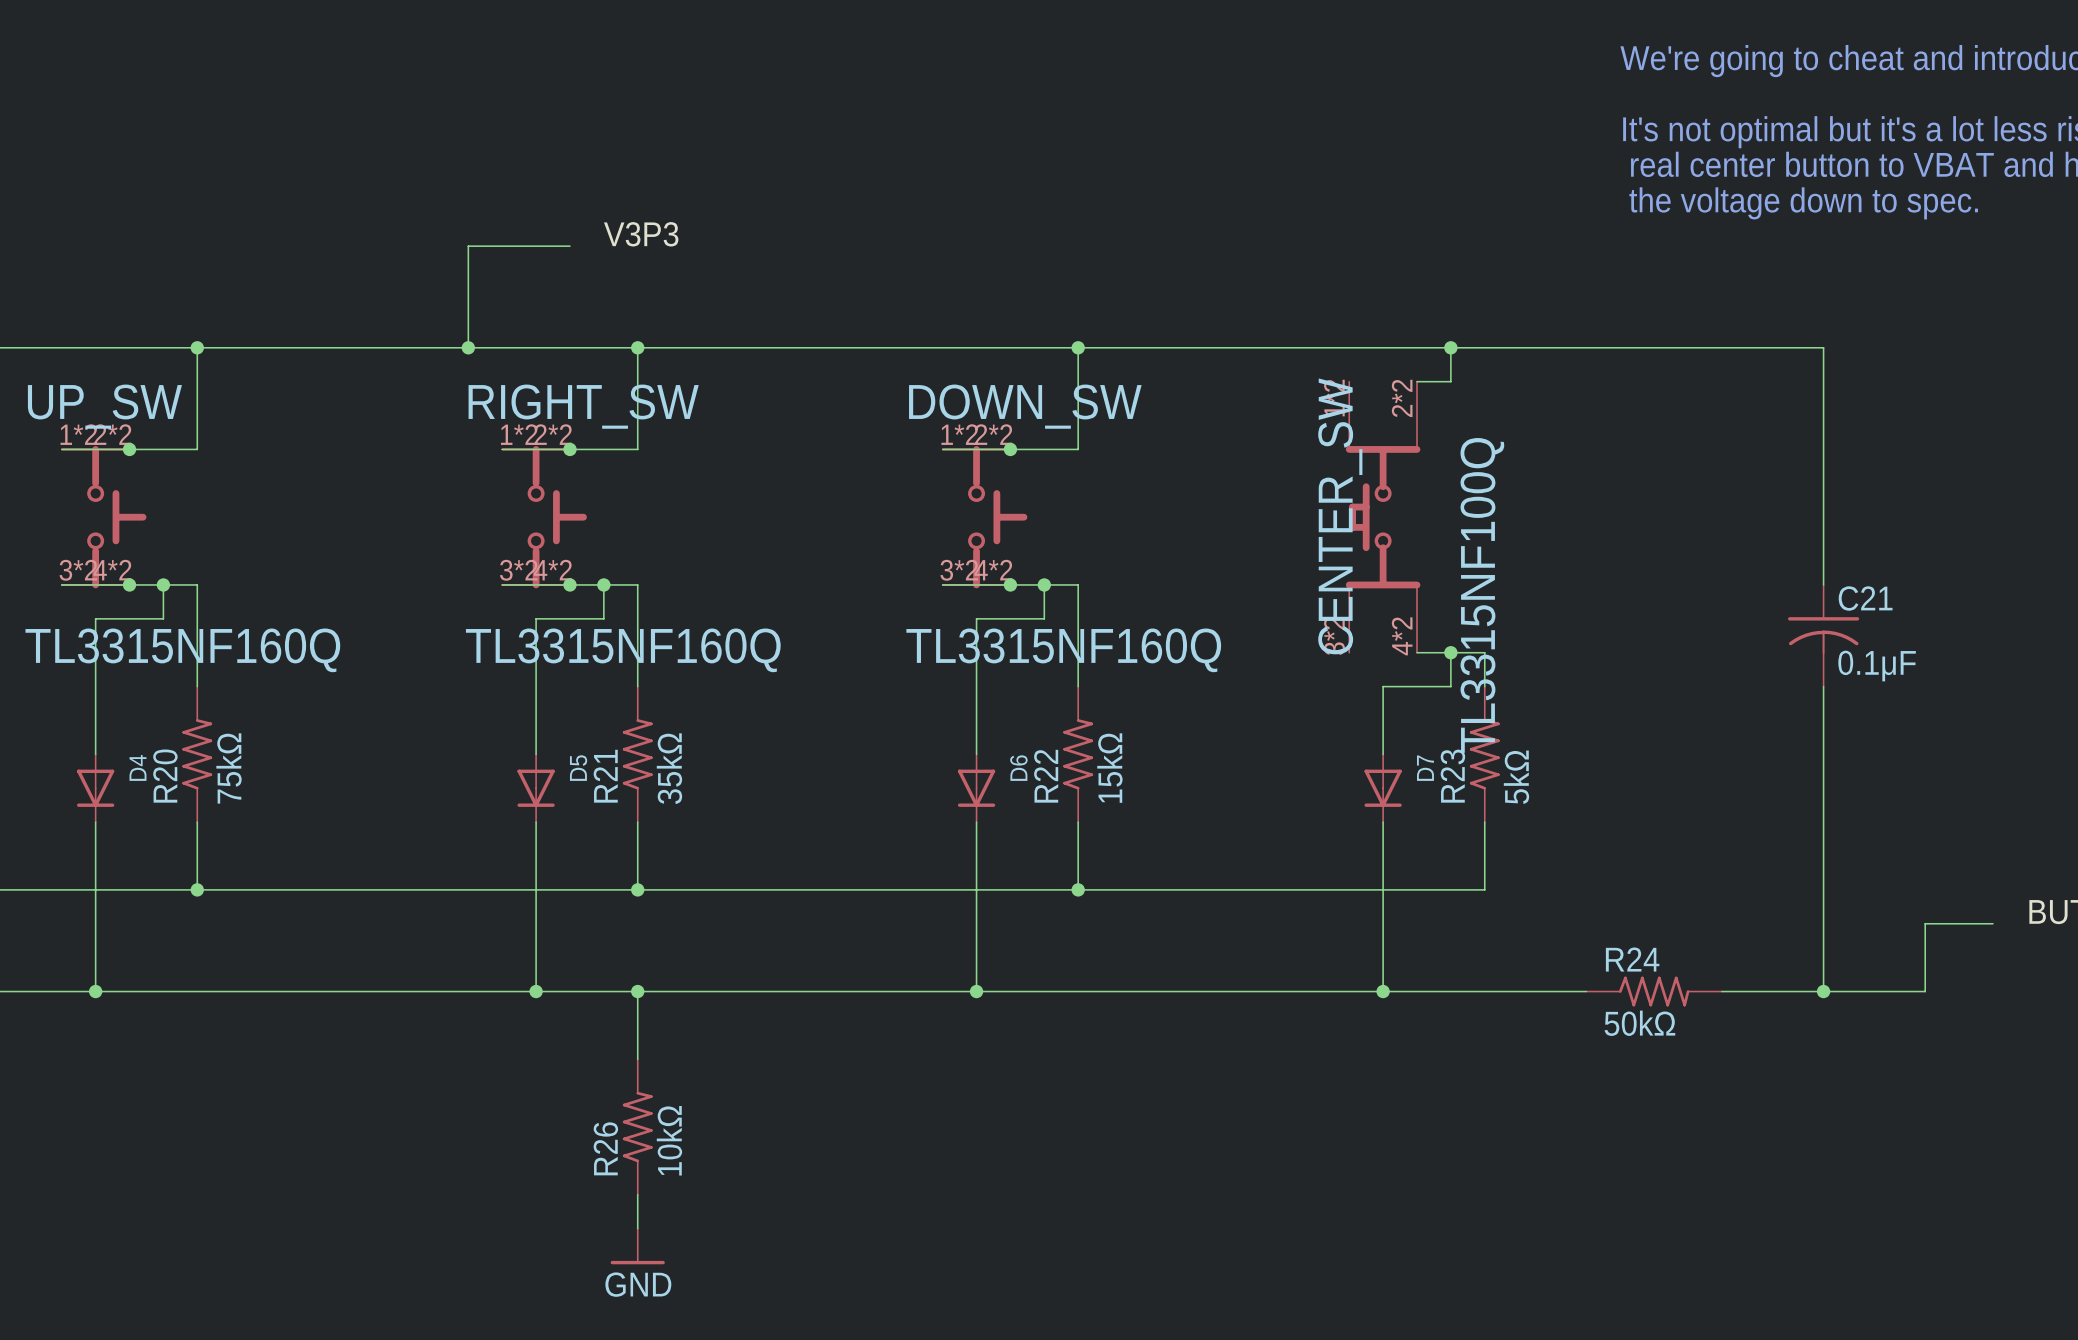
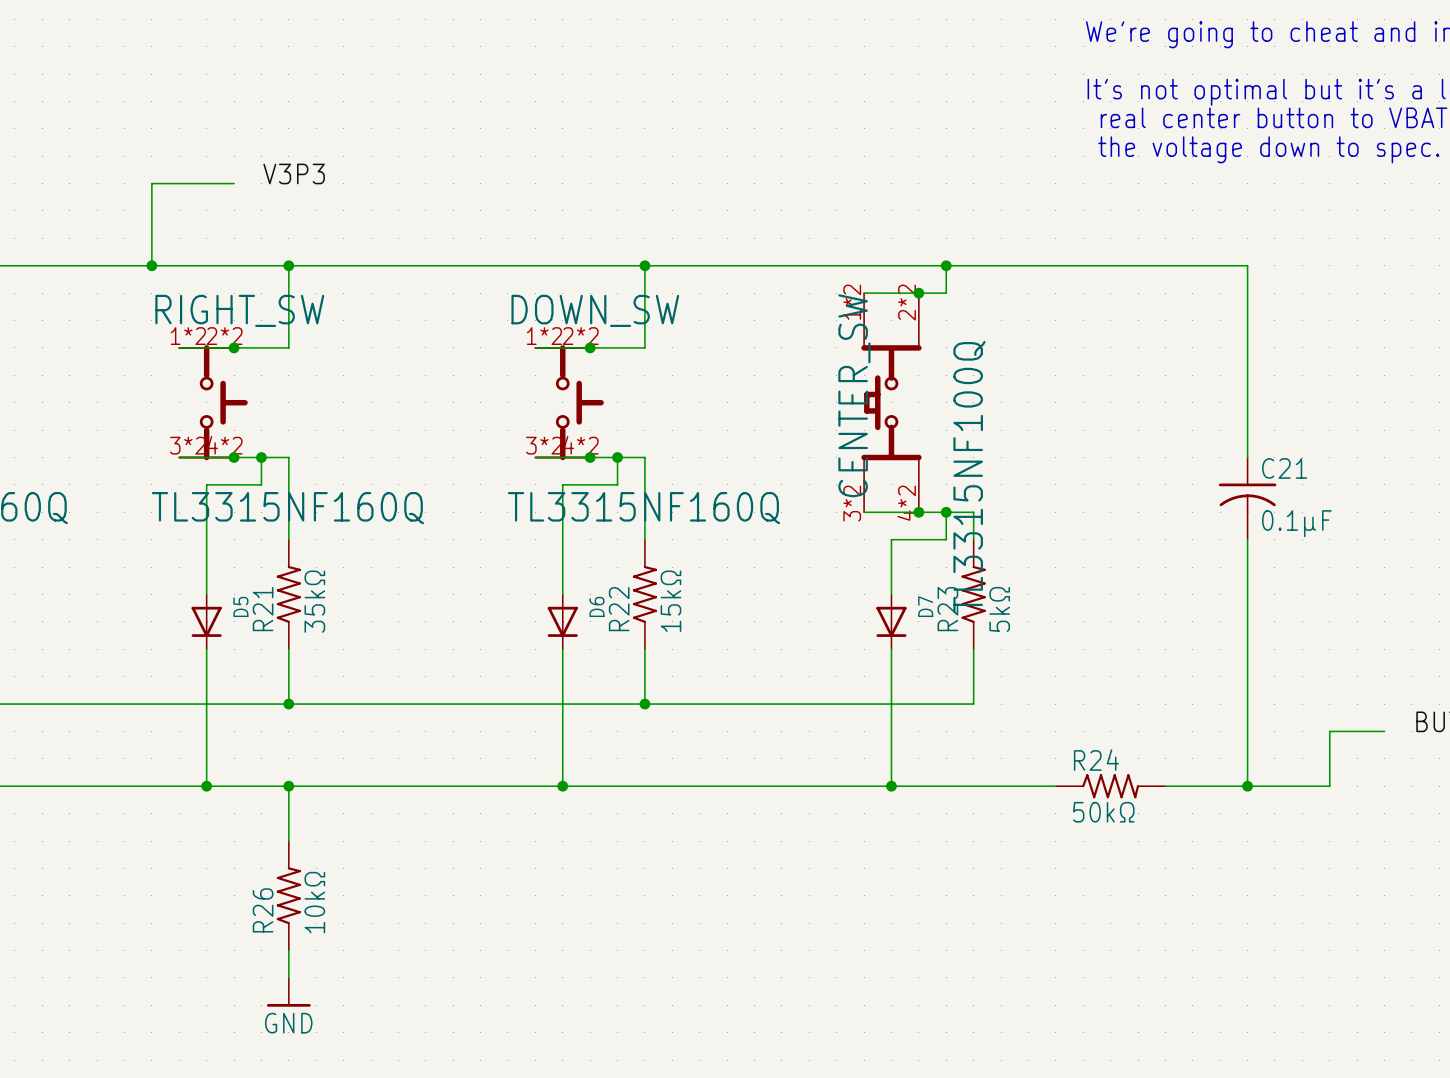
wire: none -> (864, 293) (918, 293)
junction: none -> (918, 293)
wire: none -> (864, 512) (918, 512)
junction: none -> (918, 512)

